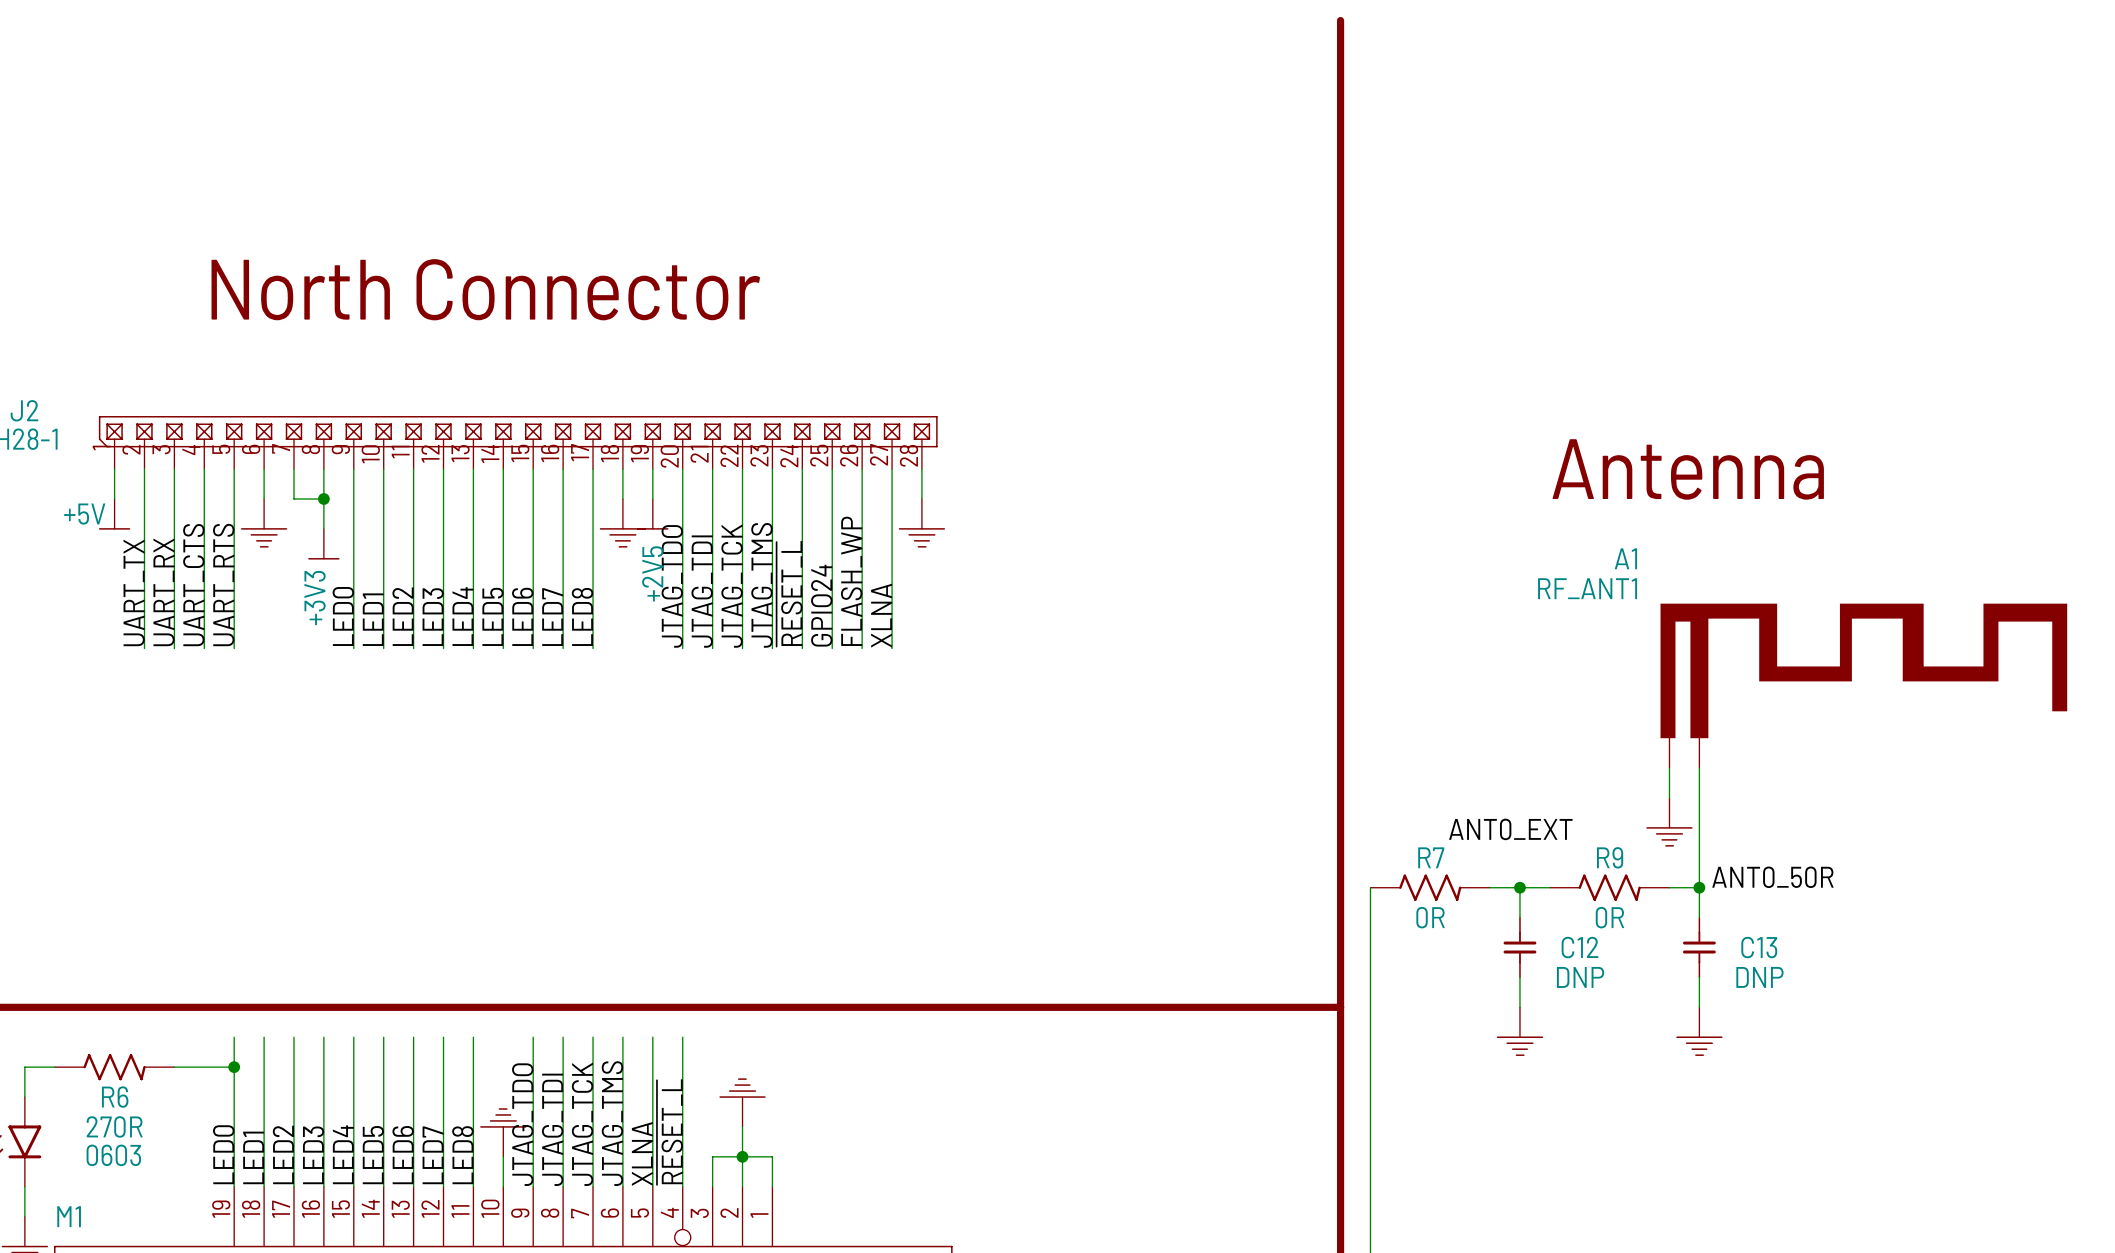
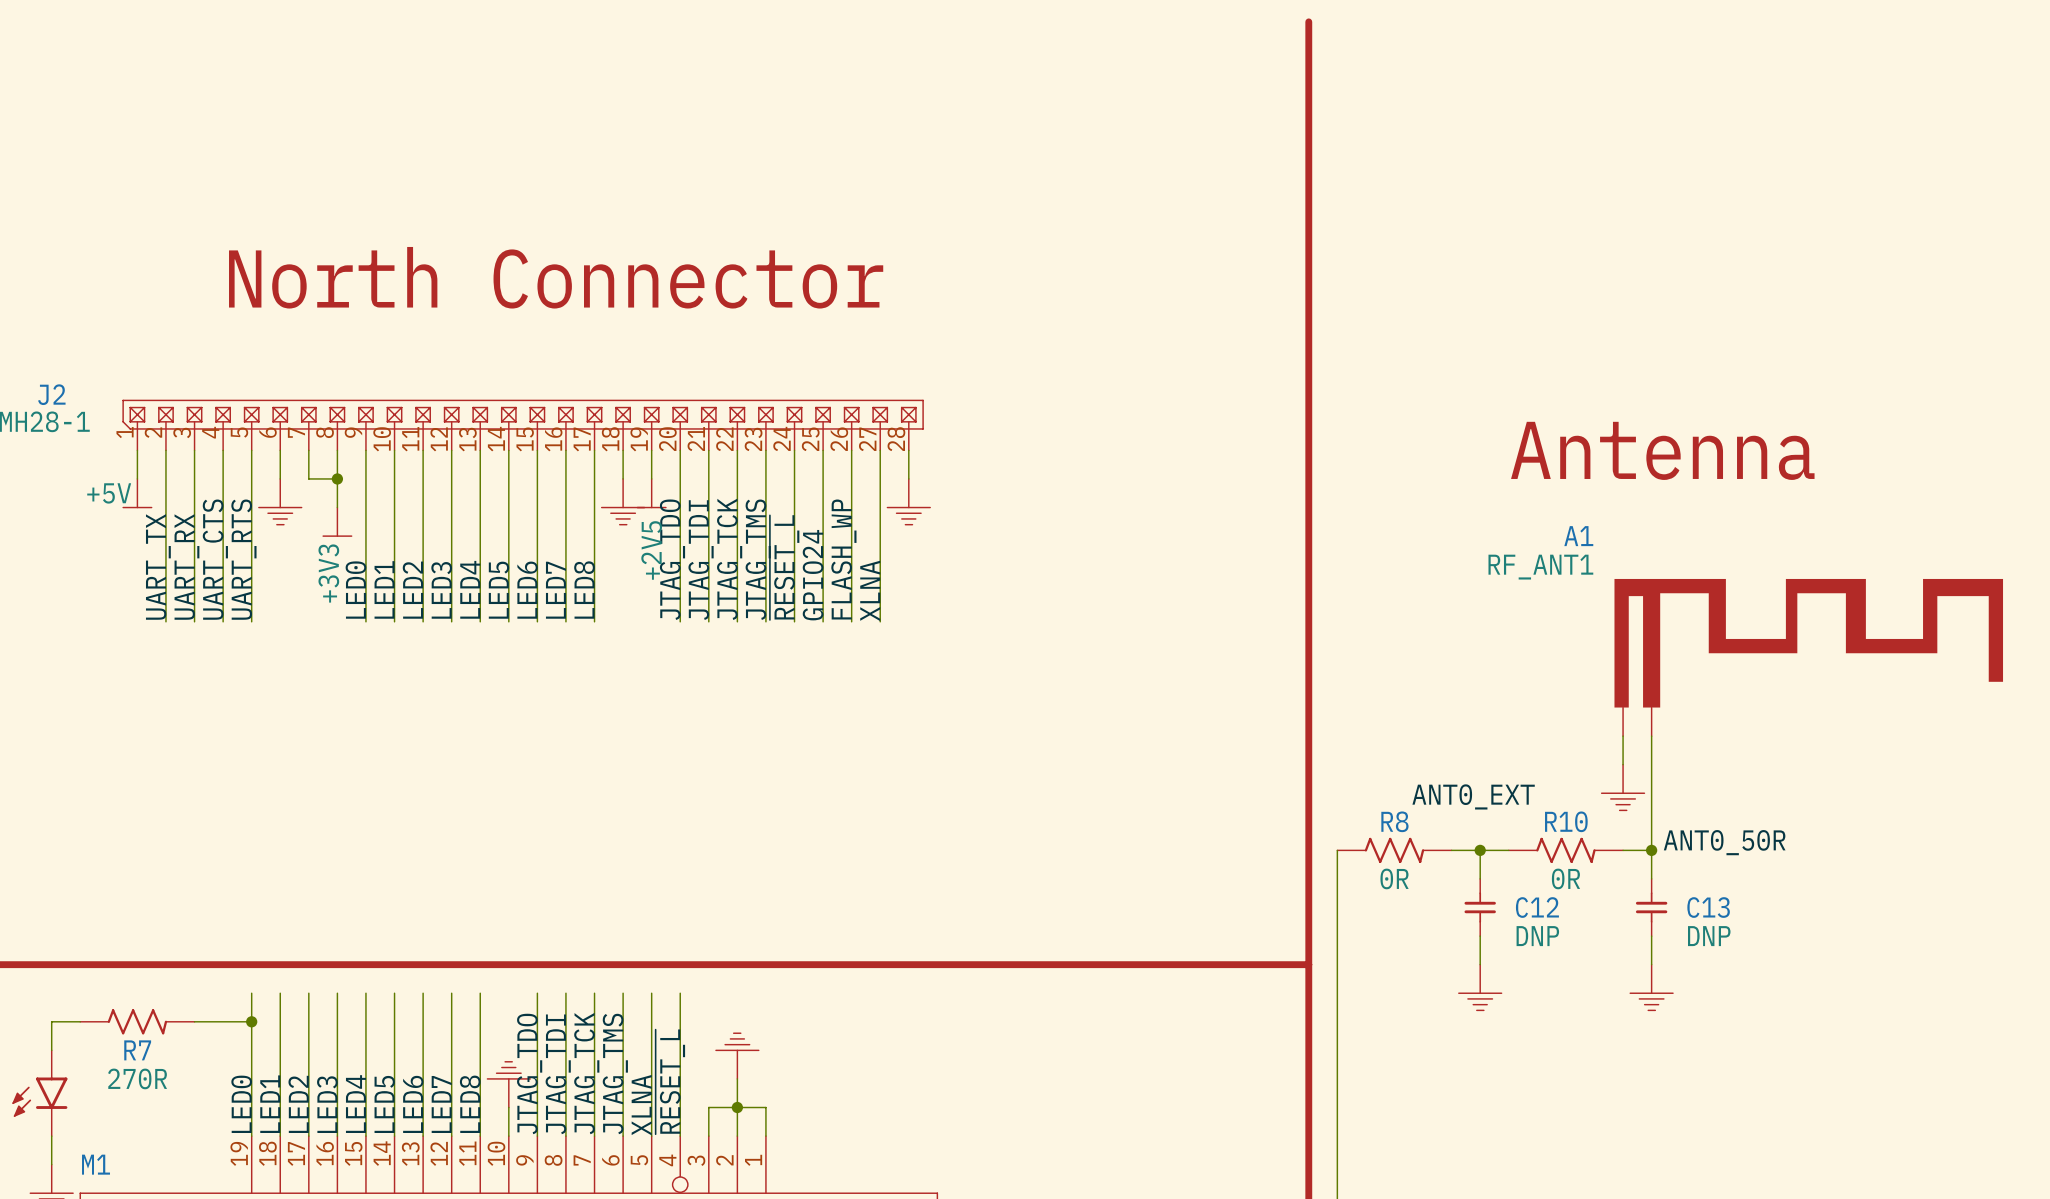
R7 name: R7 (1431, 857) -> R8 (1394, 821)
R9 name: R9 (1610, 857) -> R10 (1566, 821)
R6 name: R6 (115, 1097) -> R7 (137, 1050)
R6 text: 0603 (113, 1155) -> none

